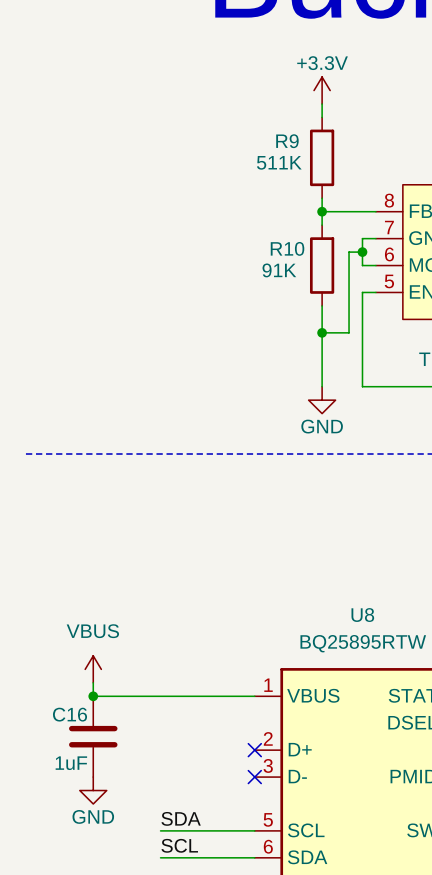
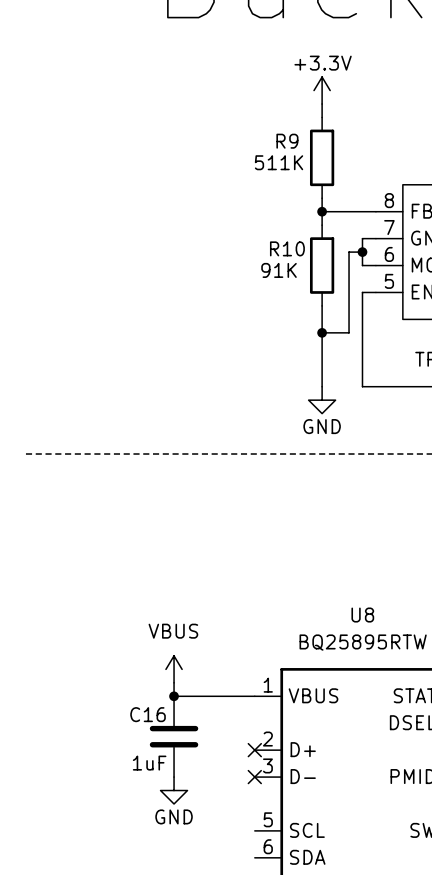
power symbol position: VBUS (93, 669) -> VBUS (174, 669)
wire: (93, 682) (93, 696) (174, 696) -> (174, 682) (174, 696)
junction: (93, 696) -> none
junction: none -> (174, 696)
C16 position: (93, 736) -> (174, 736)
power symbol position: GND (93, 790) -> GND (174, 790)
label: SDA (181, 818) -> none
wire: (160, 830) (254, 830) -> none
label: SCL (179, 845) -> none
wire: (160, 857) (254, 857) -> none

